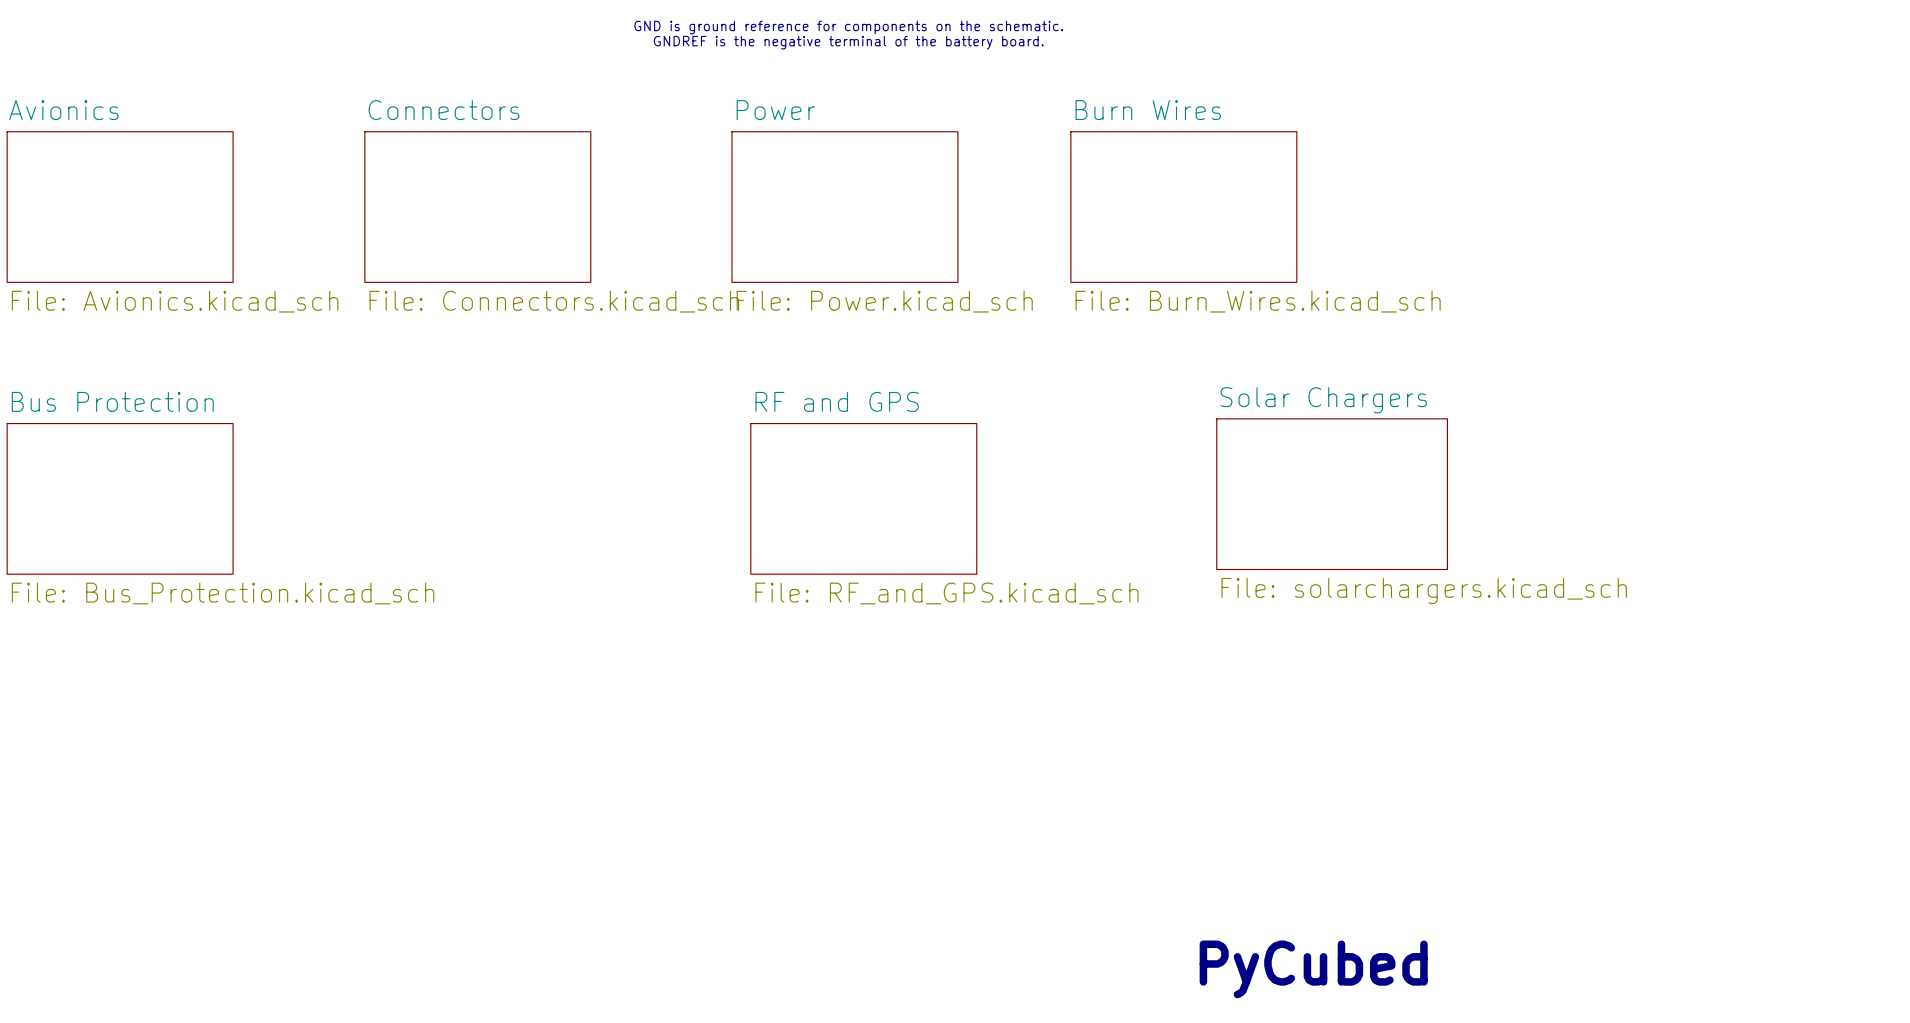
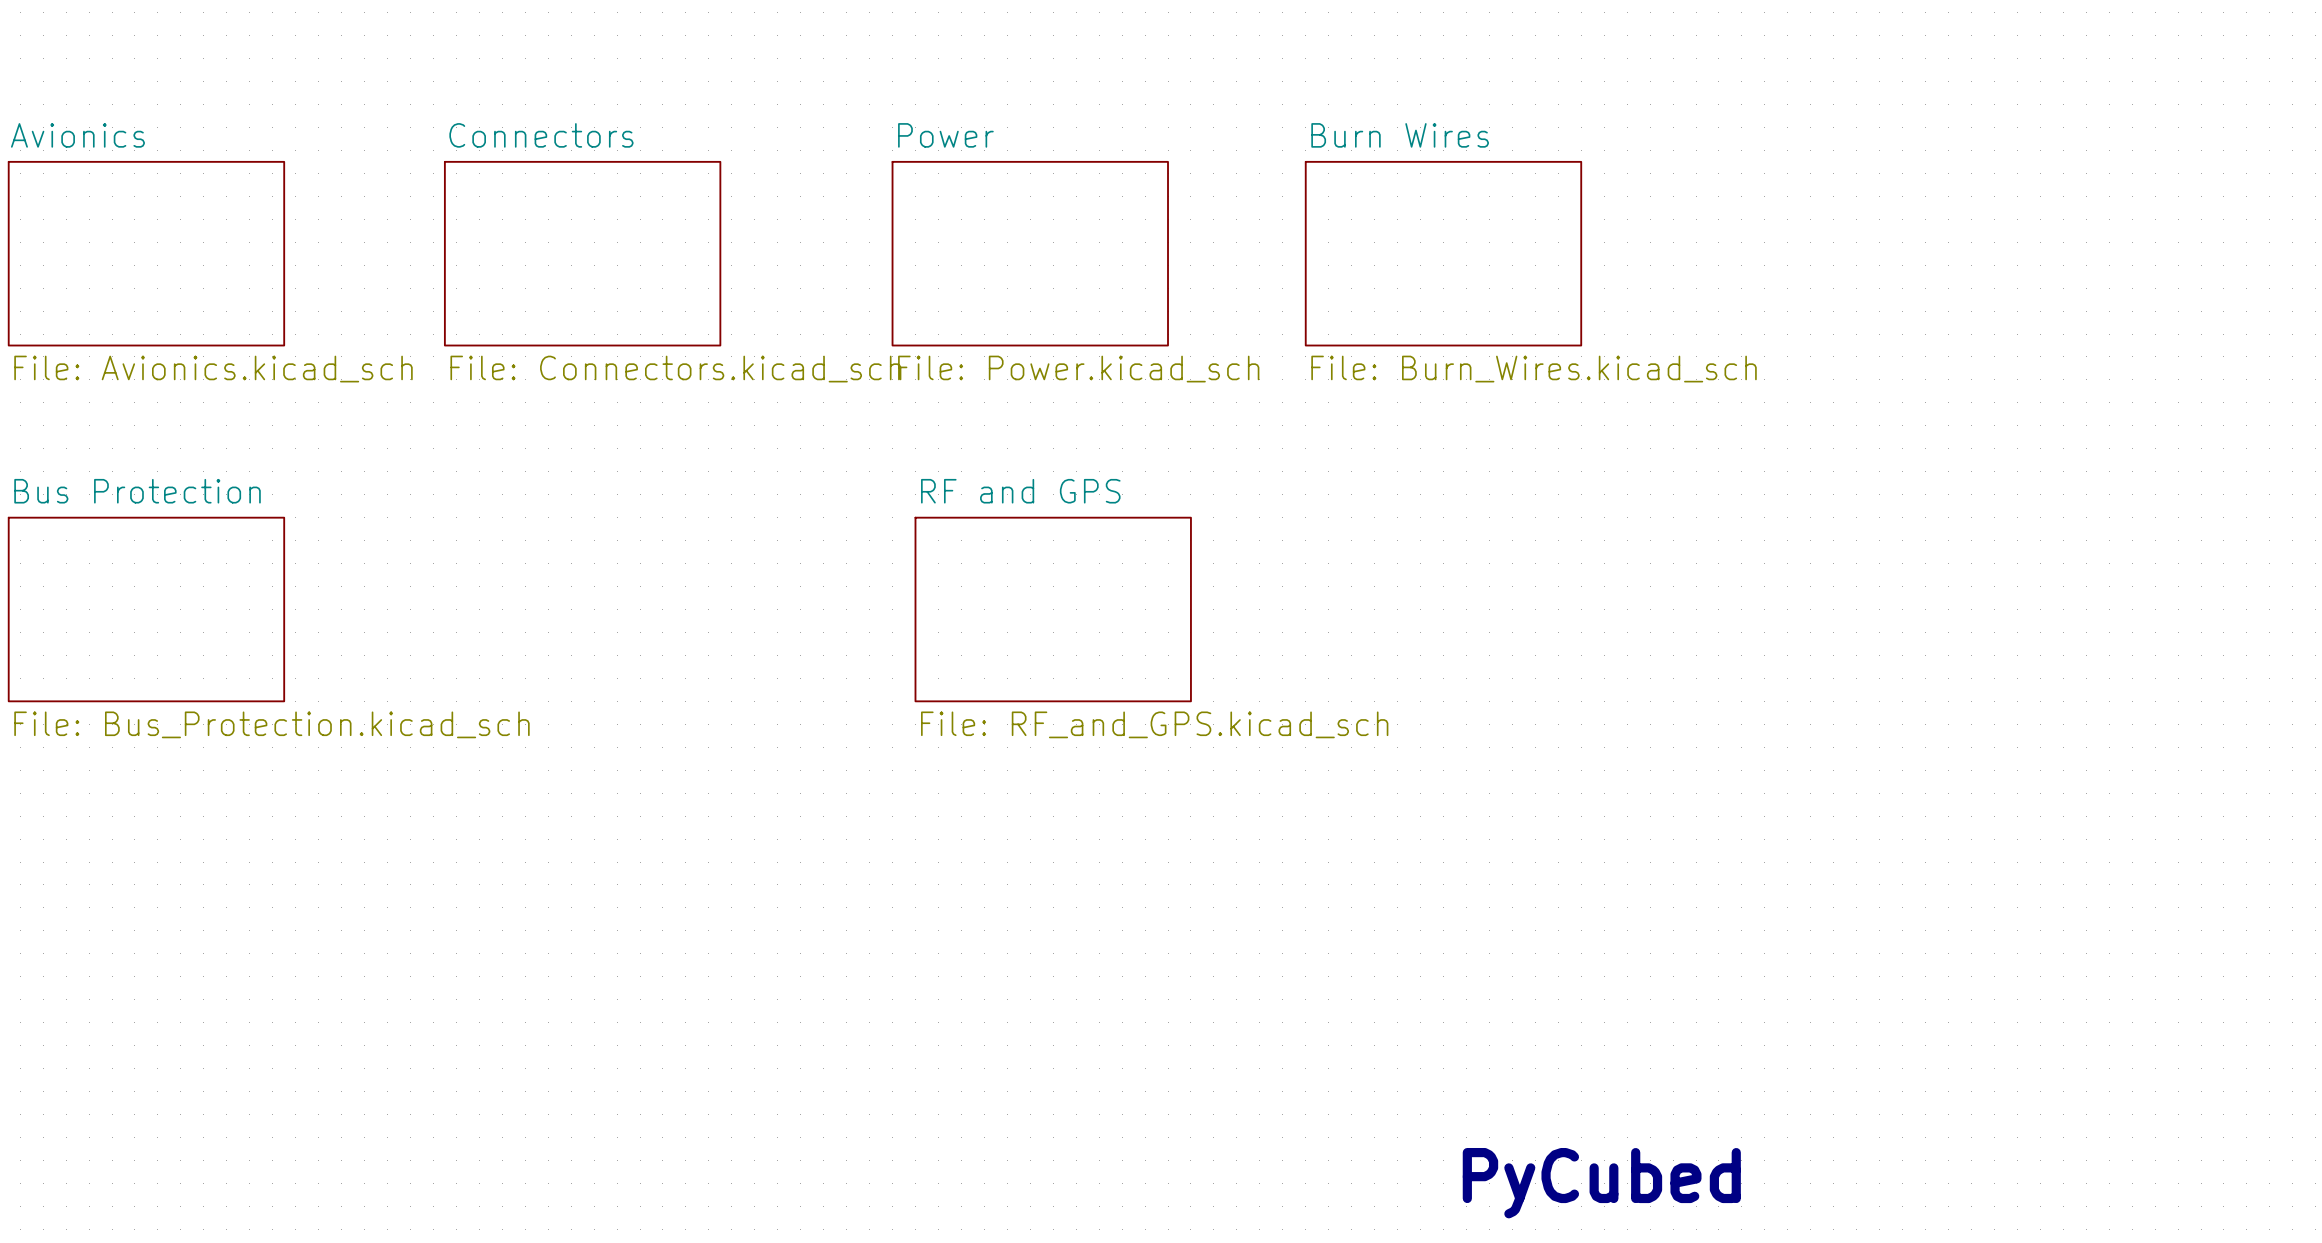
text: GND is ground reference for components on the schematic. (848, 27) -> none
text: GNDREF is the negative terminal of the battery board. (848, 42) -> none
sheet Solar Chargers: File: solarchargers.kicad_sch (1332, 494) -> none

